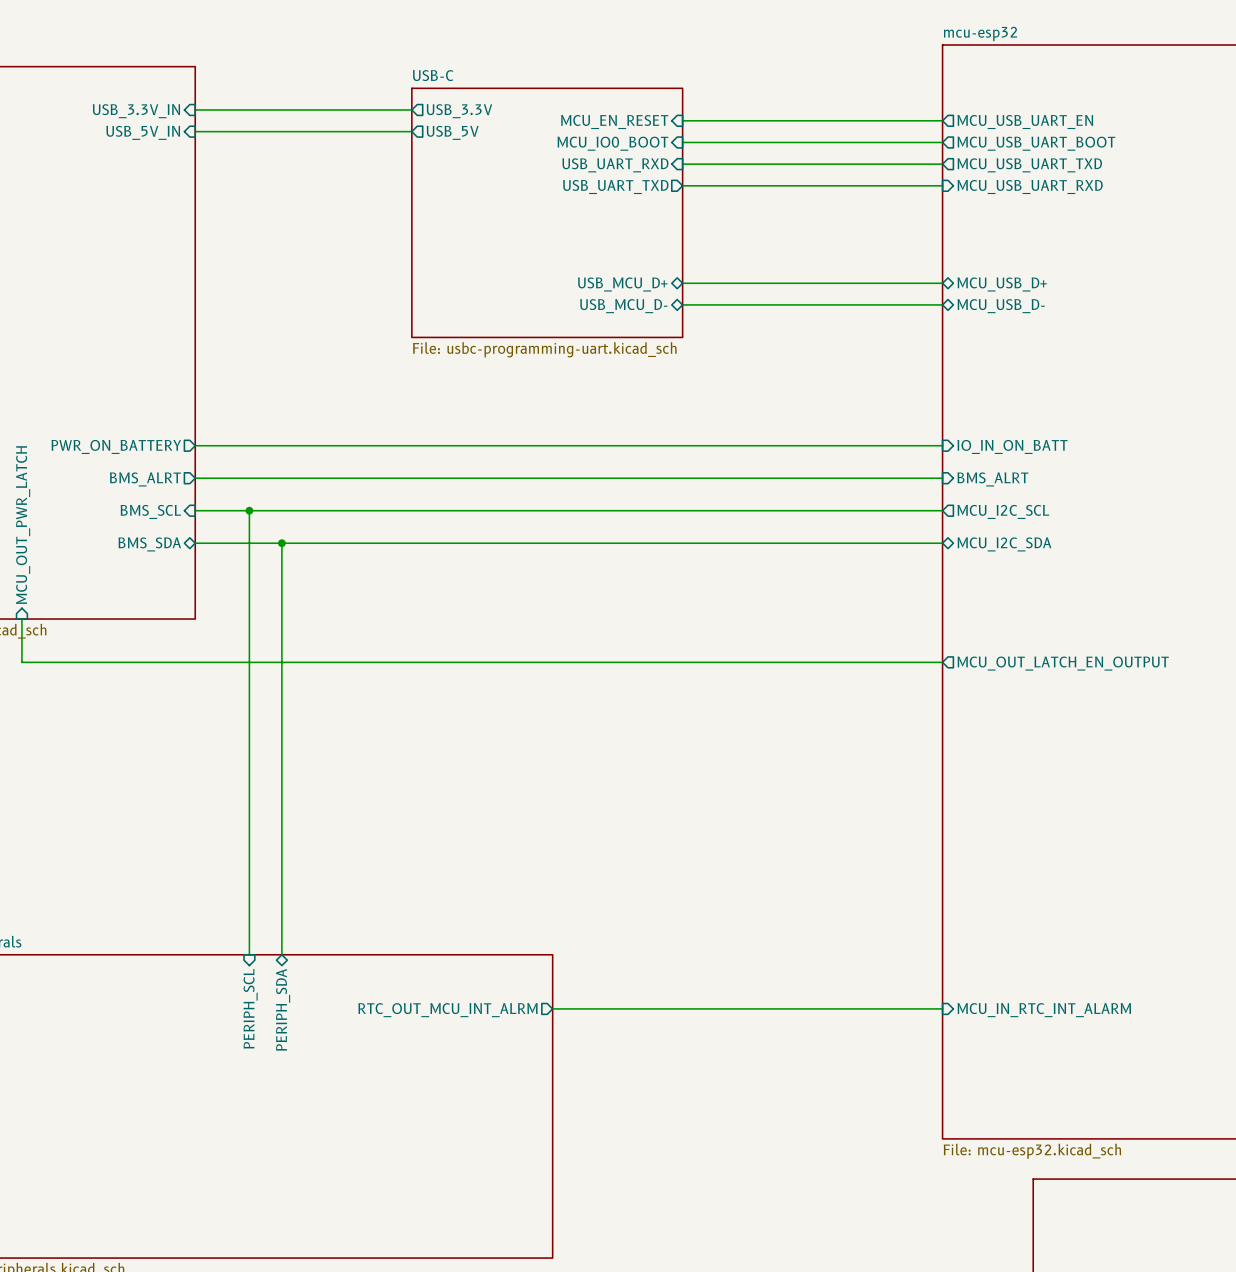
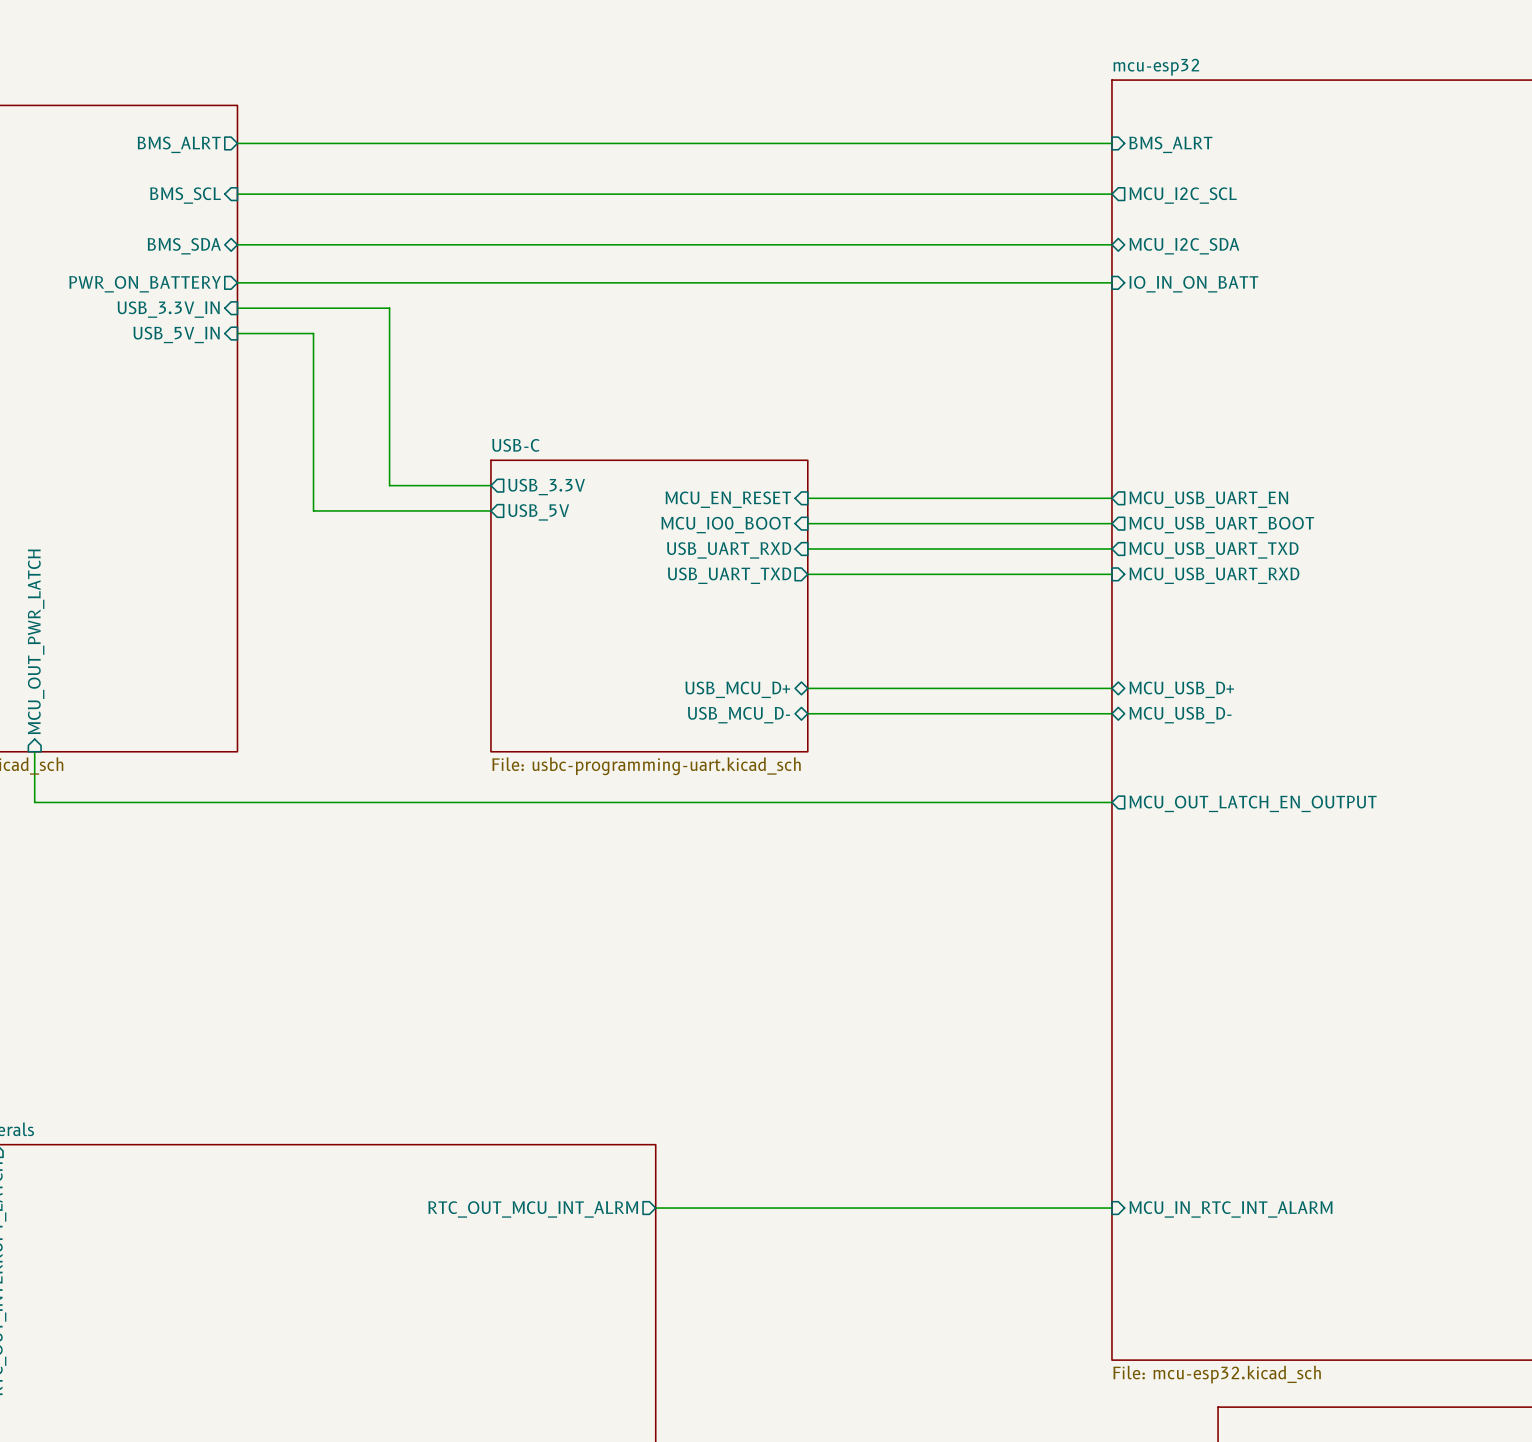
wire: none -> (237, 143) (1111, 143)
sheet pin: none -> BMS_ALRT (179, 144)
sheet pin: none -> BMS_ALRT (1170, 144)
wire: (195, 109) (411, 109) -> none
sheet pin position: USB_3.3V_IN (136, 111) -> USB_3.3V_IN (168, 309)
sheet pin: USB_3.3V (459, 111) -> none
wire: (682, 120) (942, 120) -> none
sheet pin: MCU_EN_RESET (614, 122) -> none
sheet pin: MCU_USB_UART_EN (1025, 122) -> none
wire: (195, 131) (411, 131) -> none
sheet pin position: USB_5V_IN (143, 132) -> USB_5V_IN (176, 334)
sheet pin: USB_5V (452, 132) -> none
wire: none -> (237, 194) (807, 194)
sheet pin: none -> BMS_SCL (185, 195)
sheet pin: MCU_IO0_BOOT (612, 143) -> none
sheet pin: MCU_USB_UART_BOOT (1036, 143) -> MCU_I2C_SCL (1183, 195)
wire: (682, 164) (942, 164) -> none
sheet pin: USB_UART_RXD (615, 165) -> none
sheet pin: MCU_USB_UART_TXD (1029, 165) -> none
wire: none -> (237, 244) (807, 244)
sheet pin: none -> BMS_SDA (184, 246)
sheet pin: USB_UART_TXD (615, 187) -> none
sheet pin shape: input (1030, 187) -> bidirectional (1184, 246)
sheet pin: MCU_USB_UART_RXD (1030, 187) -> MCU_I2C_SDA (1184, 246)
sheet USB-C: File: usbc-programming-uart.kicad_sch (547, 212) -> none
wire: none -> (237, 282) (1111, 282)
sheet pin: none -> PWR_ON_BATTERY (145, 284)
sheet pin: none -> IO_IN_ON_BATT (1193, 284)
wire: none -> (237, 308) (389, 308) (389, 485) (490, 485)
wire: none -> (237, 333) (313, 333) (313, 510) (490, 510)
wire: (682, 283) (942, 283) -> (807, 498) (1111, 498)
sheet pin: USB_MCU_D+ (622, 284) -> none
sheet pin: MCU_USB_D+ (1002, 284) -> none
wire: (682, 304) (942, 304) -> (807, 523) (1111, 523)
sheet pin: USB_MCU_D- (623, 306) -> none
sheet pin: MCU_USB_D- (1001, 306) -> none
sheet pin: none -> USB_3.3V (546, 487)
sheet pin: none -> MCU_EN_RESET (728, 499)
sheet pin: none -> MCU_USB_UART_EN (1208, 499)
sheet pin: none -> USB_5V (538, 512)
sheet pin: none -> MCU_IO0_BOOT (726, 525)
sheet pin: none -> MCU_USB_UART_BOOT (1221, 525)
wire: (195, 445) (682, 445) -> none
sheet pin: PWR_ON_BATTERY (116, 446) -> none
sheet pin: none -> USB_UART_RXD (729, 550)
sheet pin shape: input (1012, 446) -> output (1214, 550)
sheet pin: IO_IN_ON_BATT (1012, 446) -> MCU_USB_UART_TXD (1214, 550)
wire: none -> (807, 574) (1111, 574)
sheet pin: none -> USB_UART_TXD (729, 575)
sheet pin: none -> MCU_USB_UART_RXD (1214, 575)
wire: (195, 478) (942, 478) -> none
sheet pin: BMS_ALRT (145, 479) -> none
sheet pin: BMS_ALRT (992, 479) -> none
sheet USB-C: none -> File: usbc-programming-uart.kicad_sch (649, 606)
wire: (195, 510) (942, 510) -> none
wire: (249, 510) (249, 954) -> none
junction: (249, 510) -> none
sheet pin: BMS_SCL (150, 511) -> none
sheet pin: MCU_I2C_SCL (1003, 511) -> none
wire: (195, 543) (942, 543) -> none
wire: (281, 543) (281, 954) -> none
junction: (281, 543) -> none
sheet pin: BMS_SDA (149, 544) -> none
sheet pin: MCU_I2C_SDA (1004, 544) -> none
wire: none -> (807, 688) (1111, 688)
sheet pin: none -> USB_MCU_D+ (737, 689)
sheet pin: none -> MCU_USB_D+ (1181, 689)
wire: none -> (807, 713) (1111, 713)
sheet pin: none -> USB_MCU_D- (738, 715)
sheet pin: none -> MCU_USB_D- (1180, 715)
sheet pin: PERIPH_SCL (250, 1008) -> none
sheet pin: PERIPH_SDA (283, 1009) -> none

